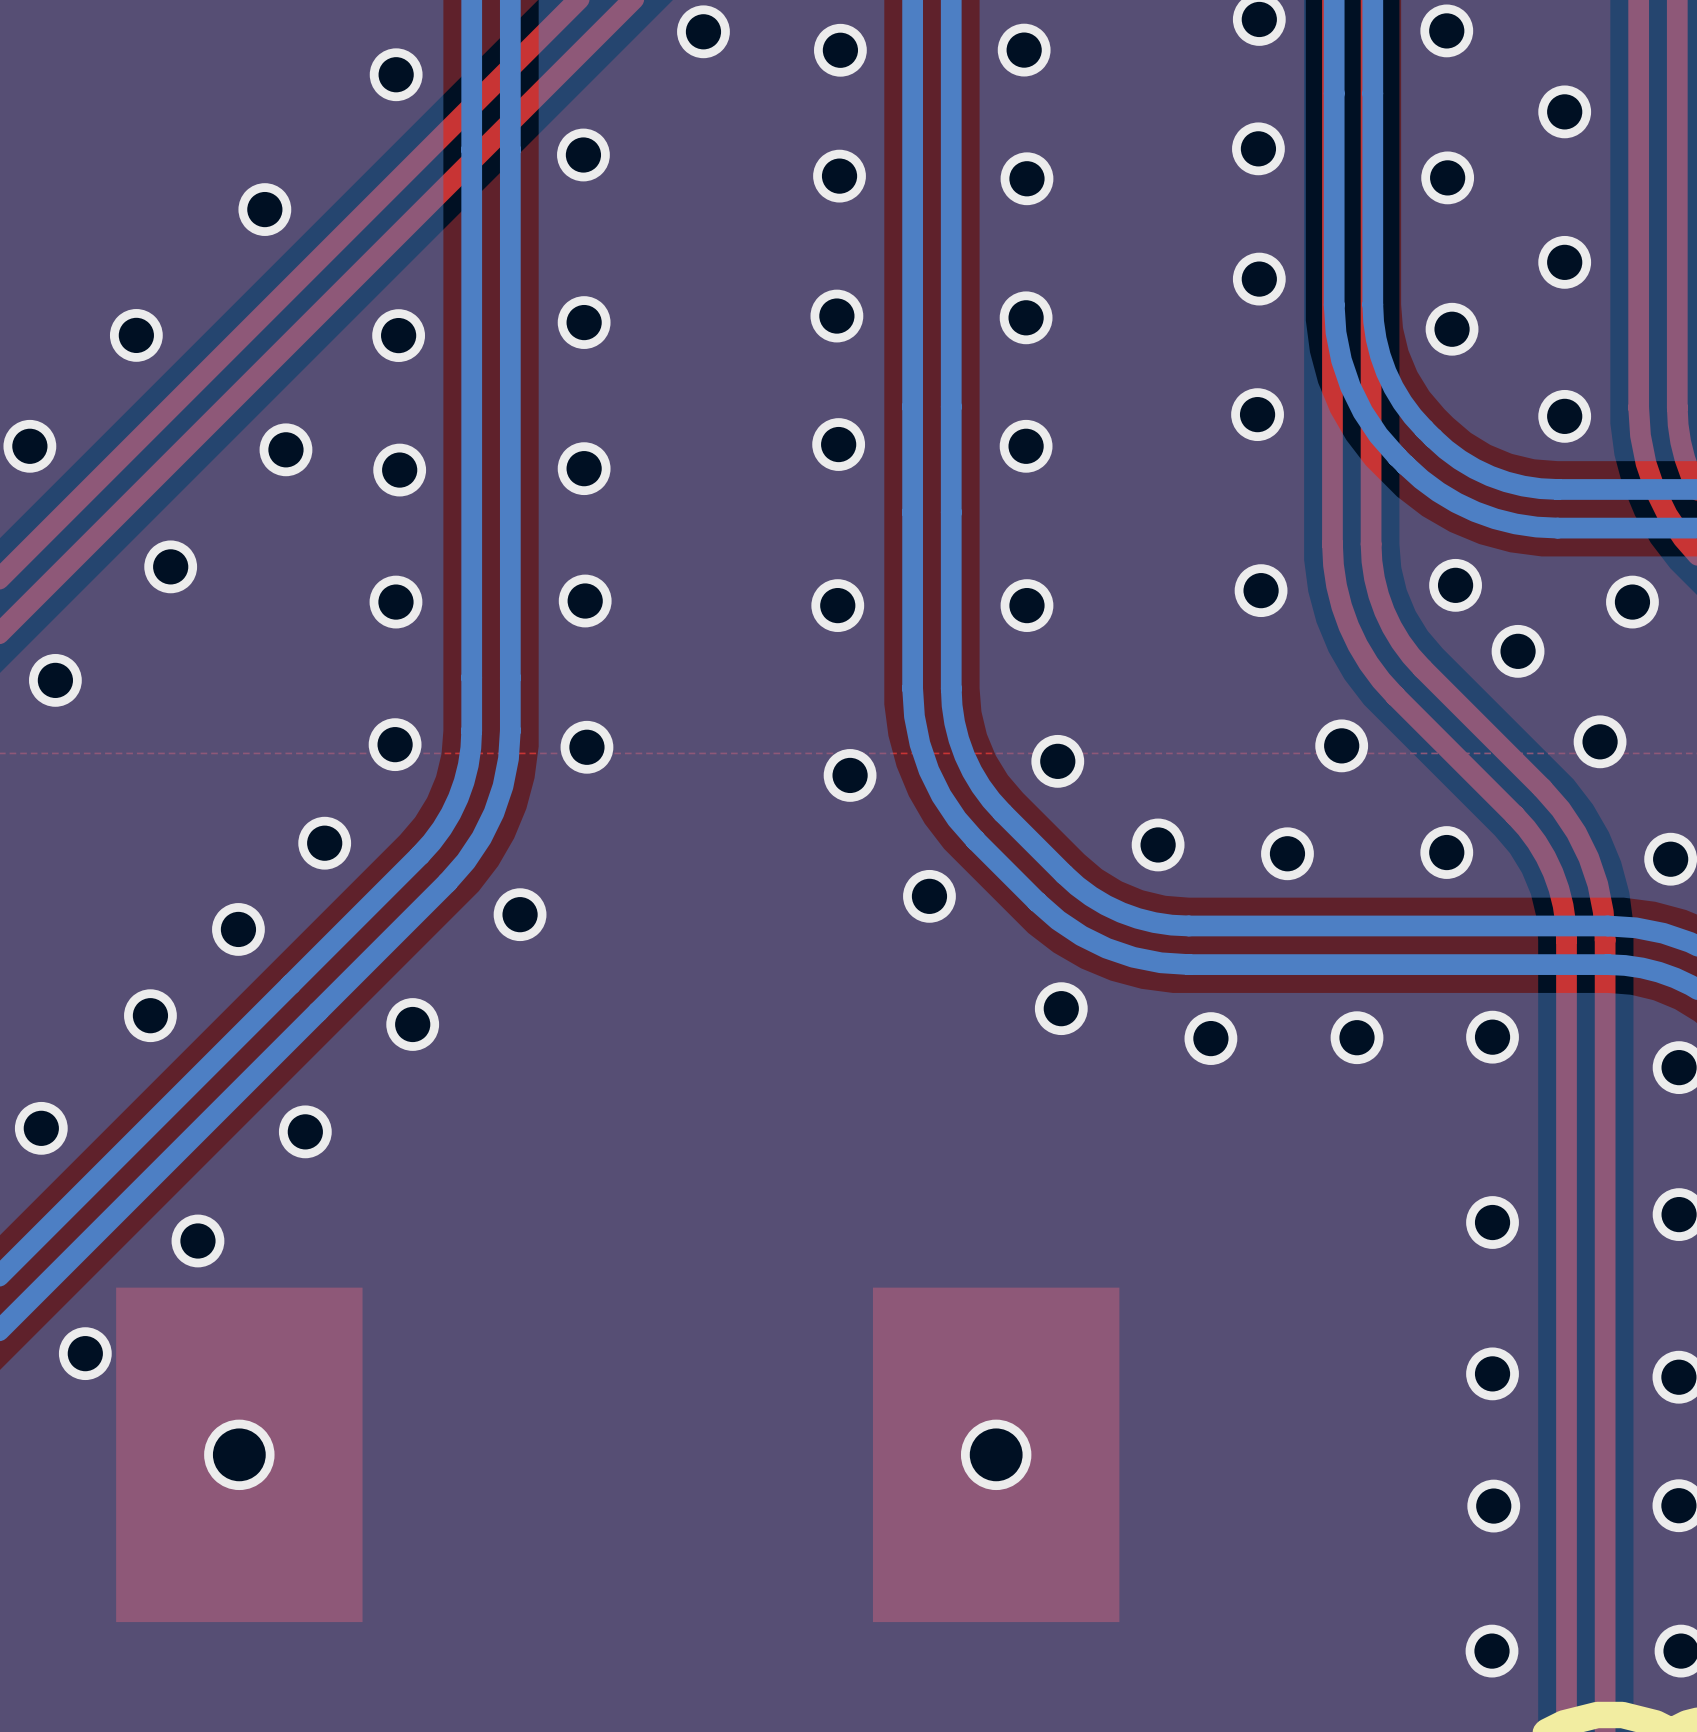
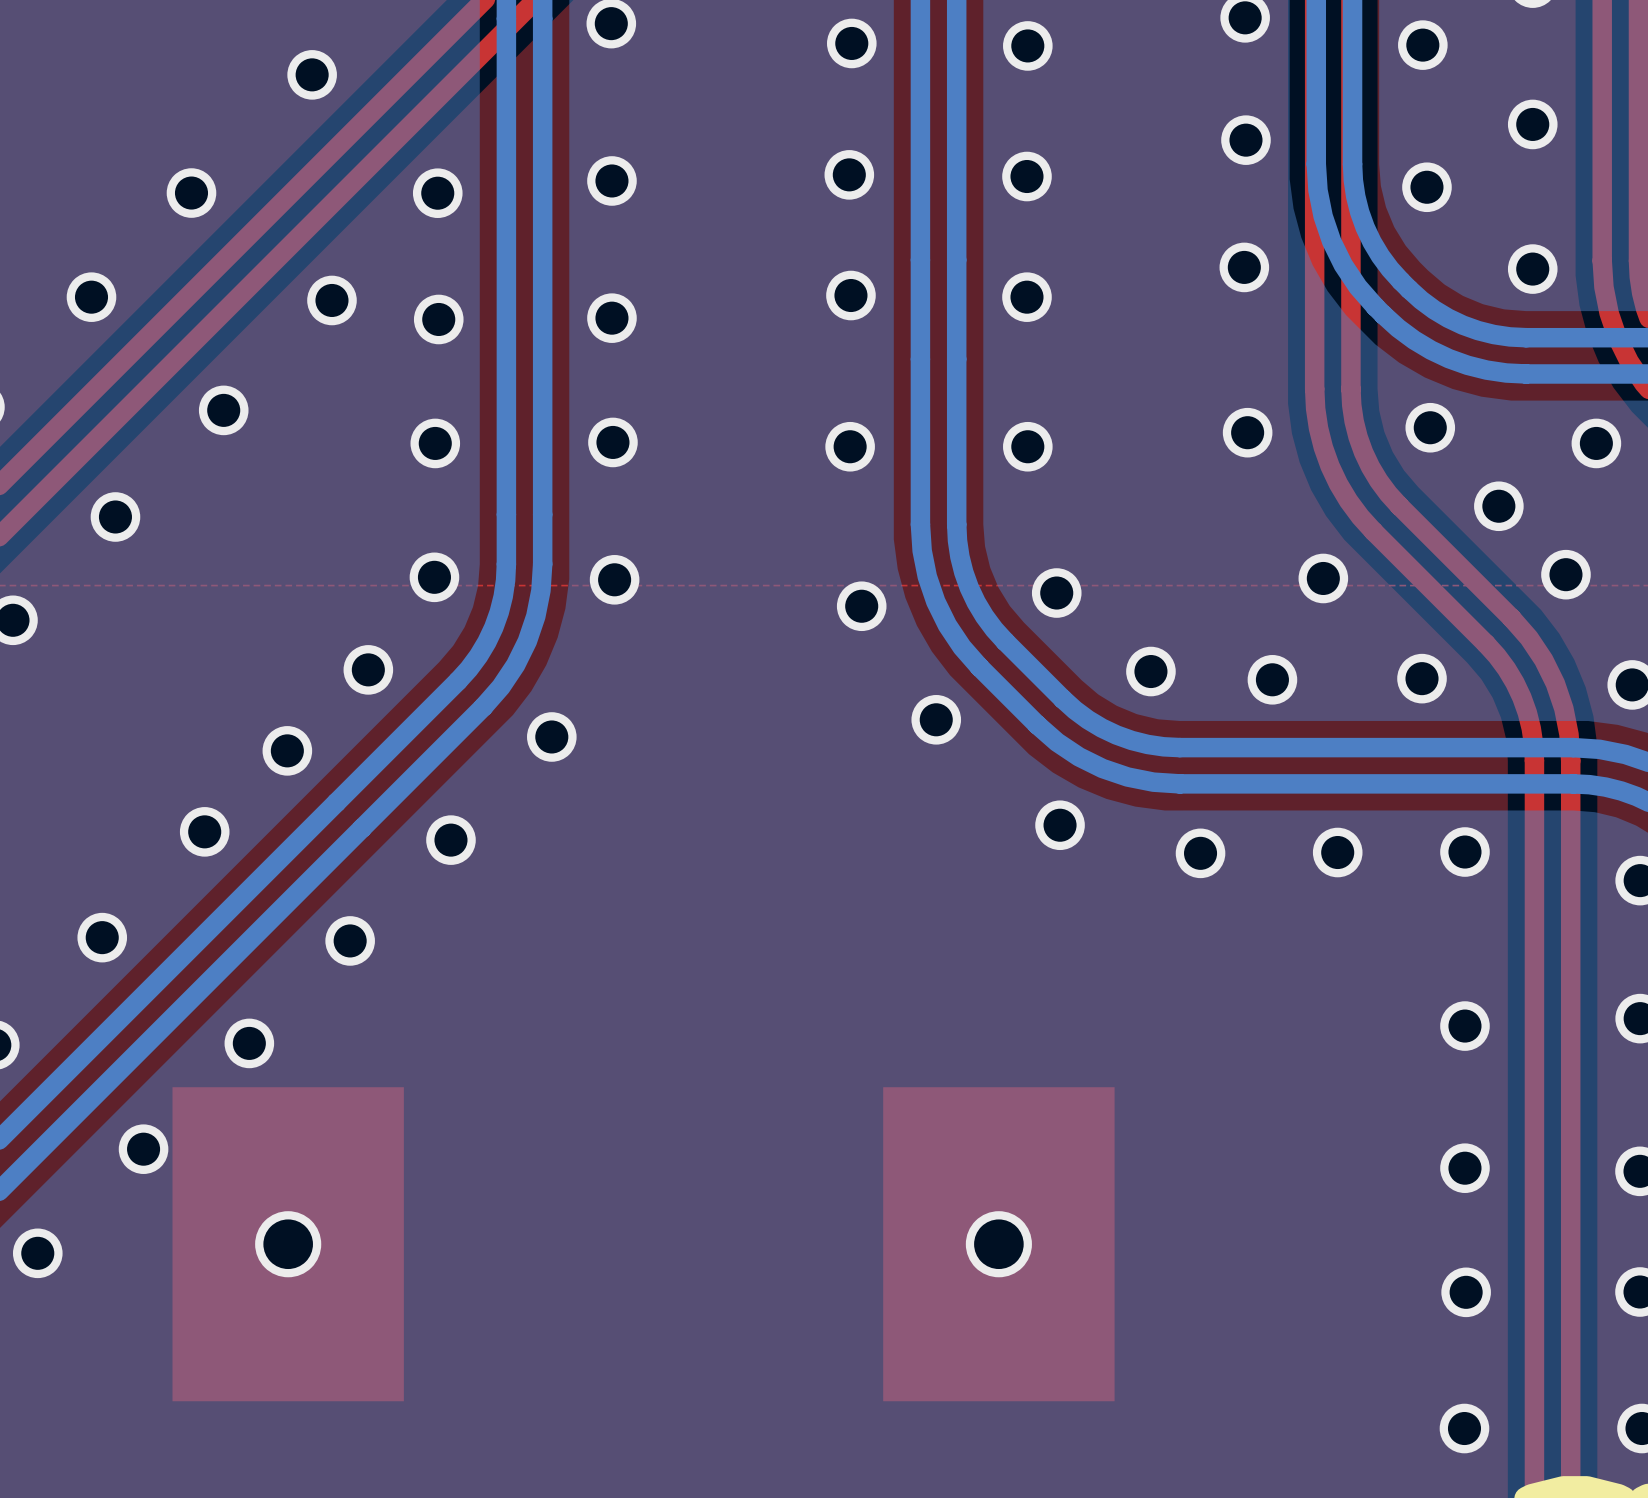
via position: (1518, 651) -> (1498, 506)

